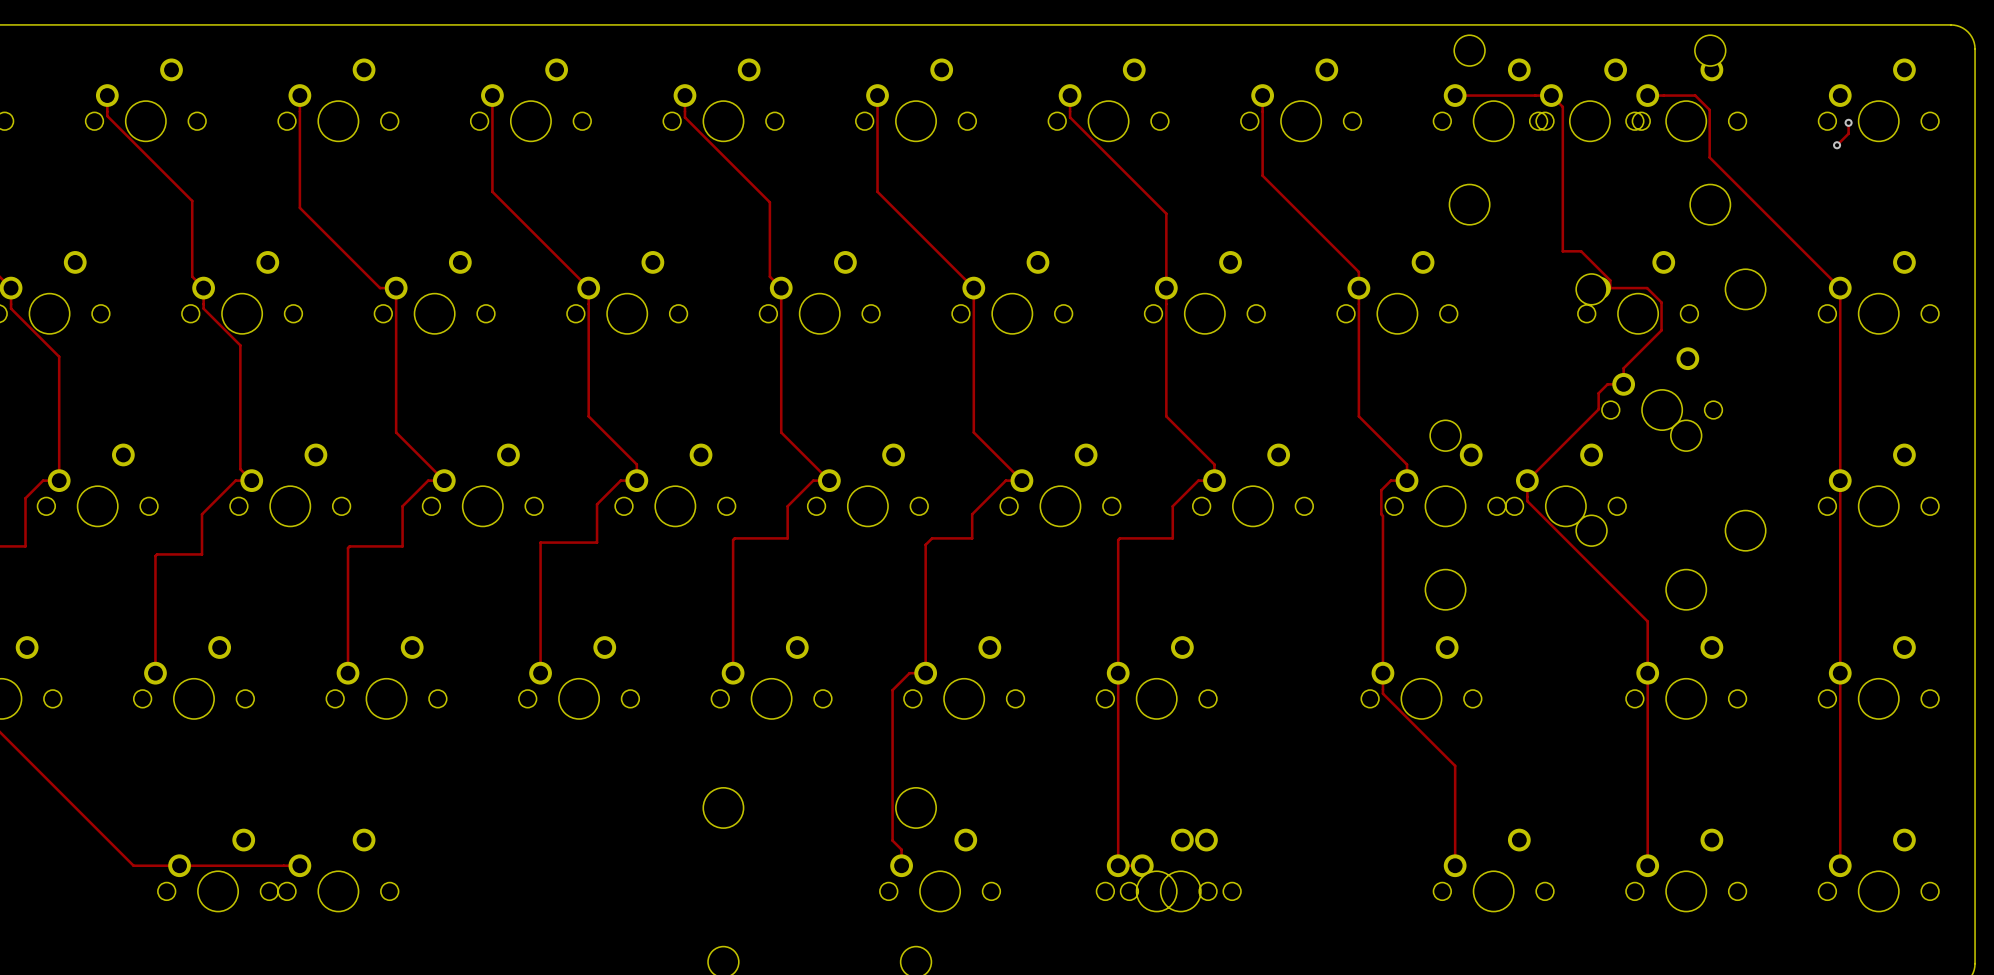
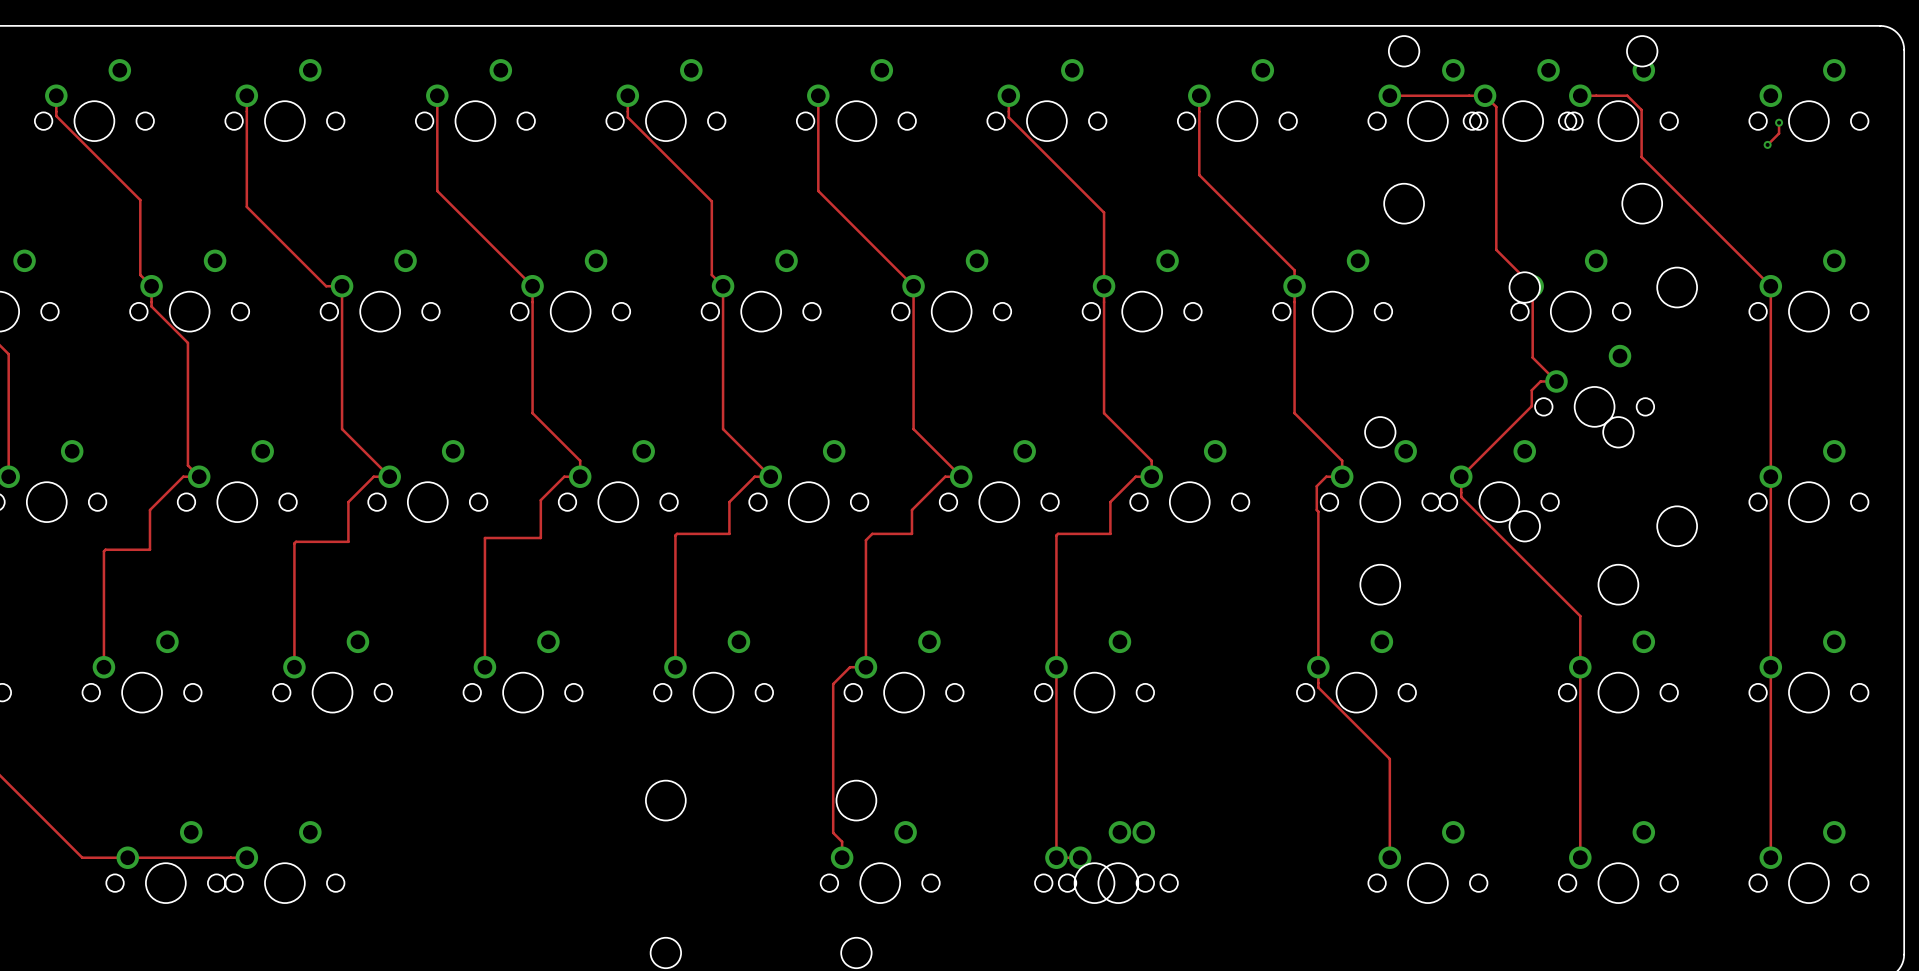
track: (1562, 251) (1581, 251) (1610, 280) (1610, 288) (1647, 288) (1661, 302) (1661, 330) (1623, 368) (1623, 384) -> (1496, 249) (1532, 286) (1532, 357) (1556, 381)

